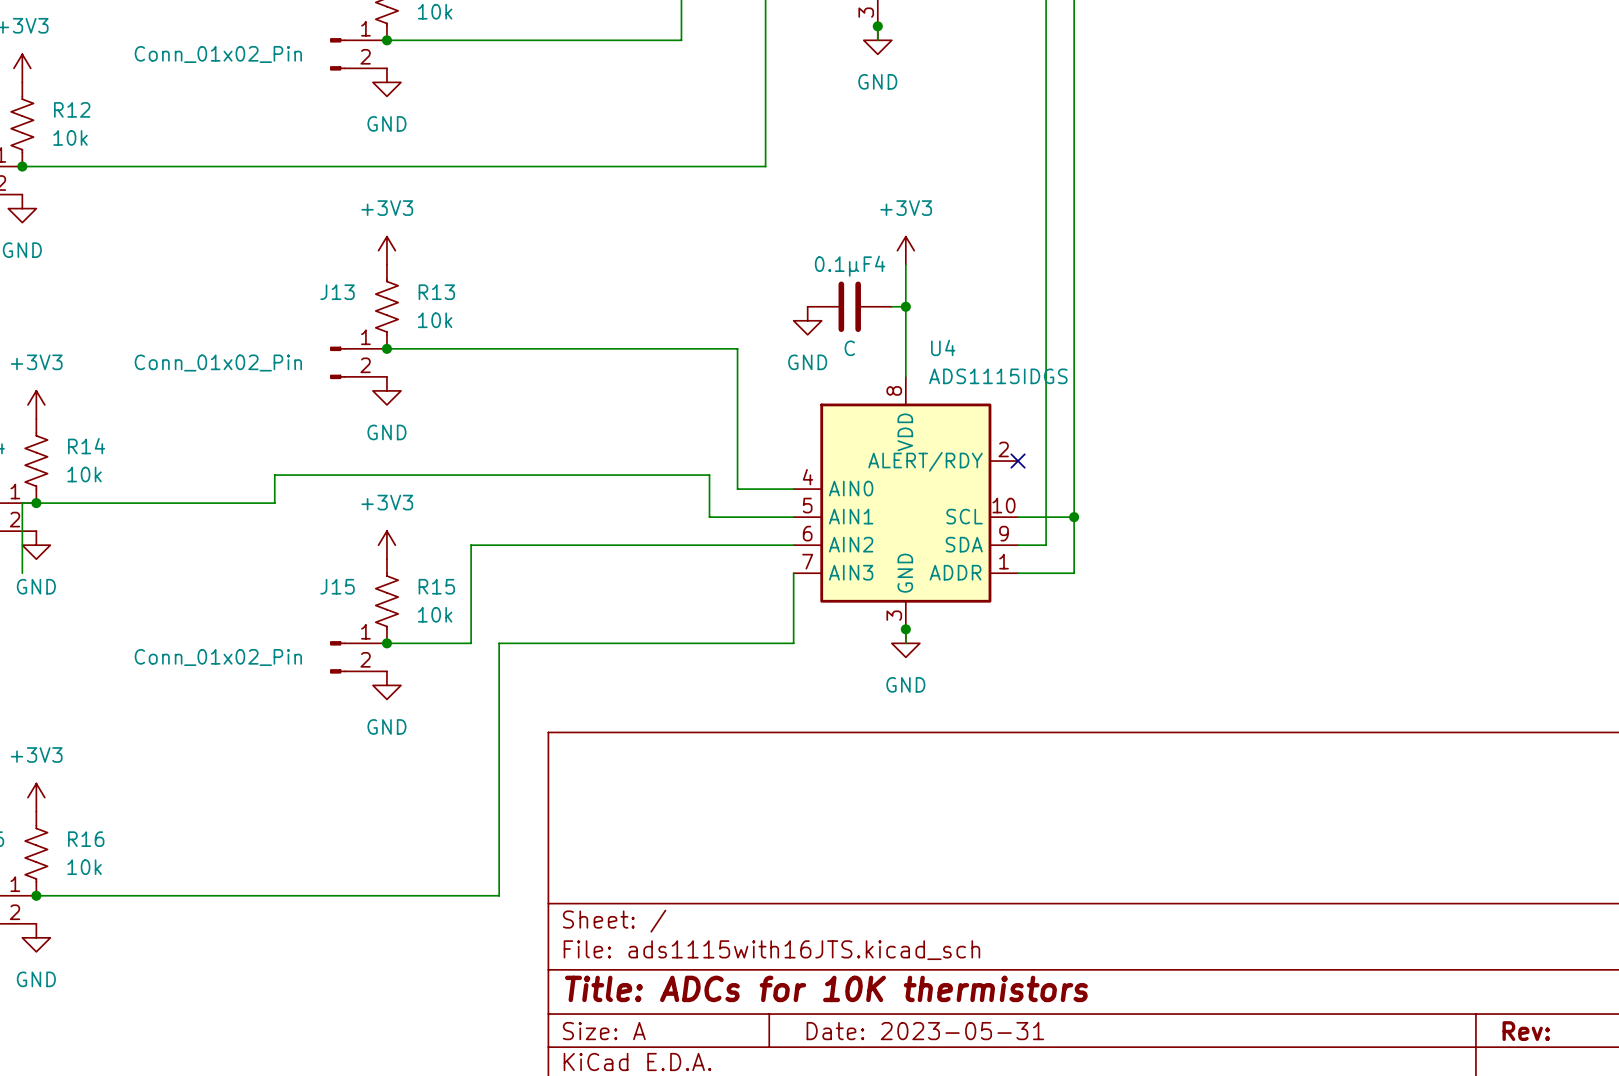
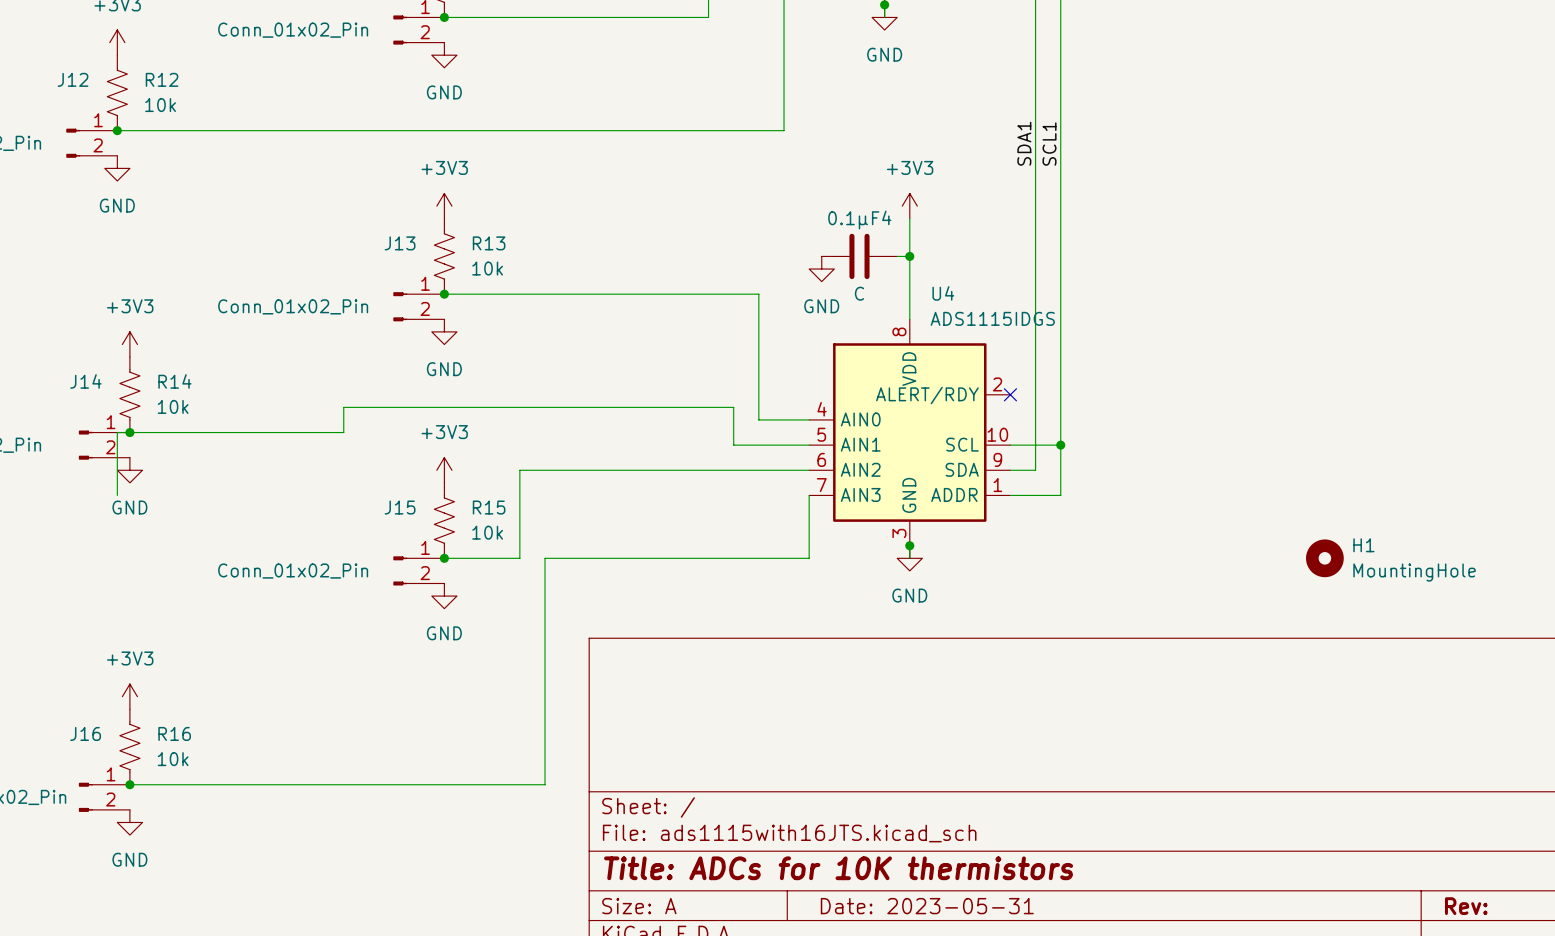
label: none -> SDA1 (1024, 143)
label: none -> SCL1 (1049, 144)
H1: none -> MountingHole (1324, 558)

